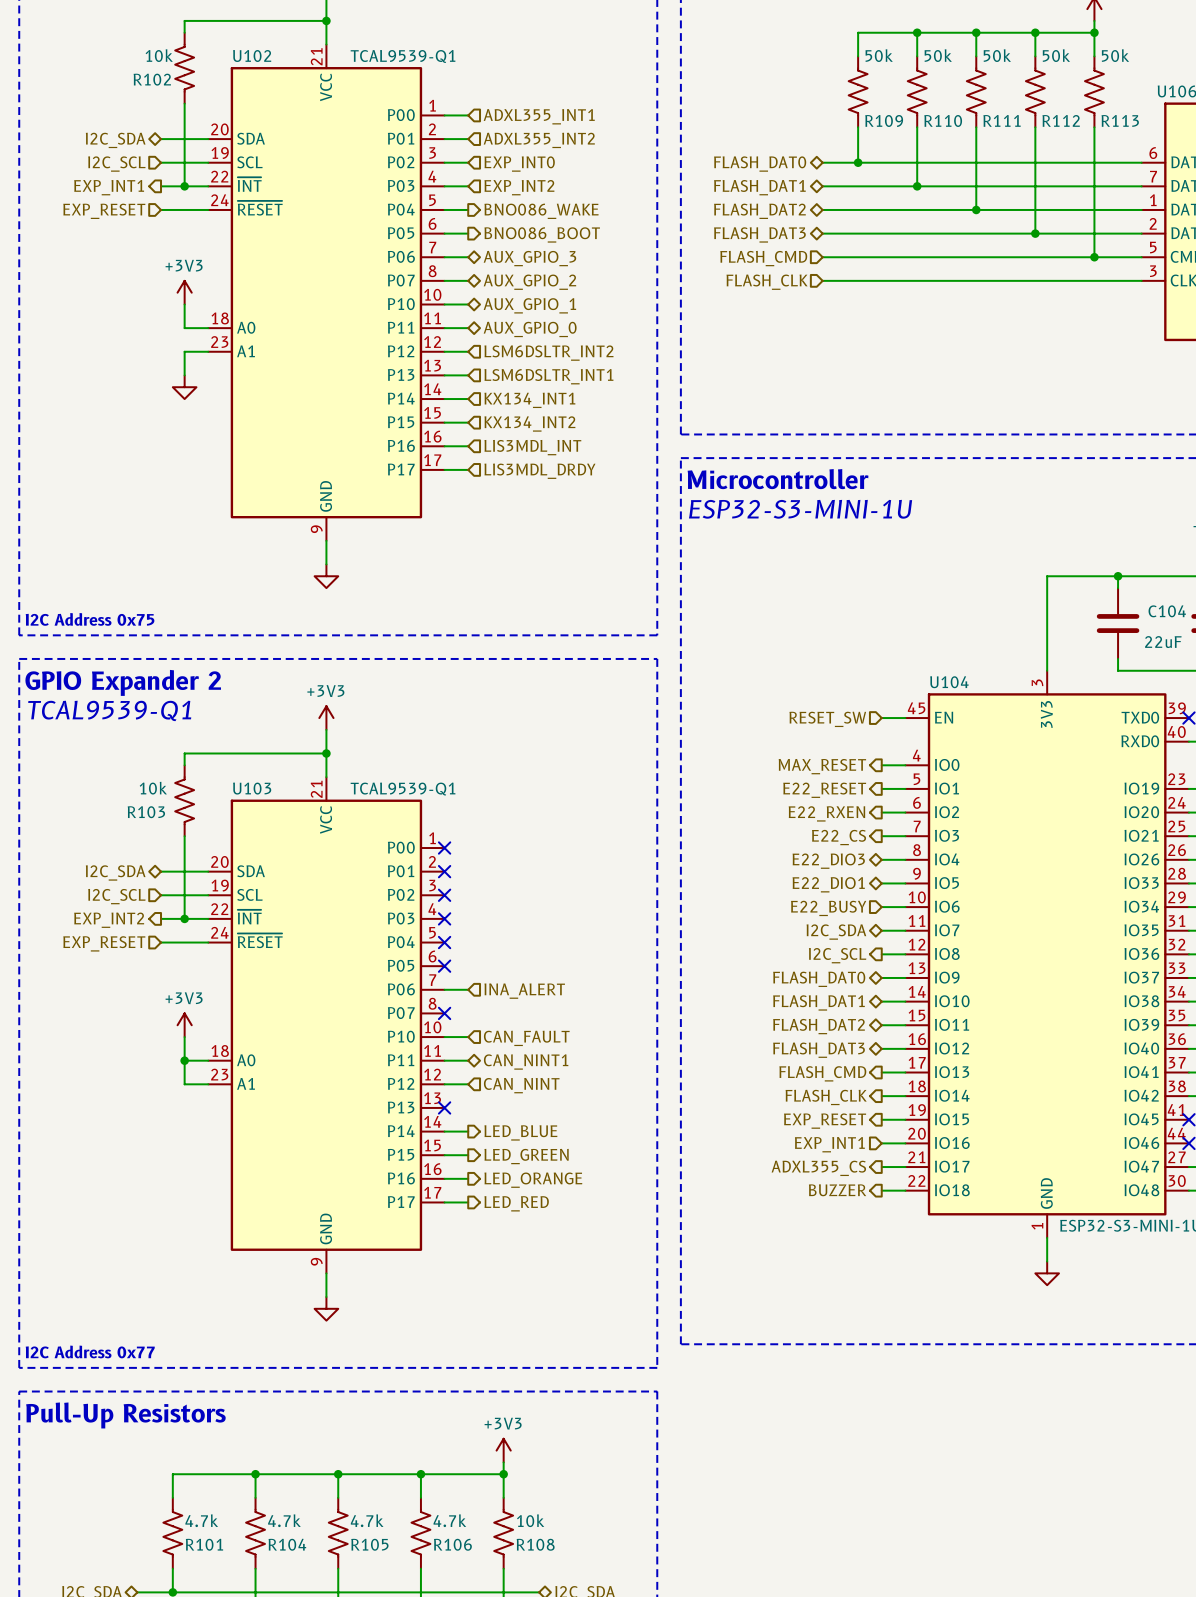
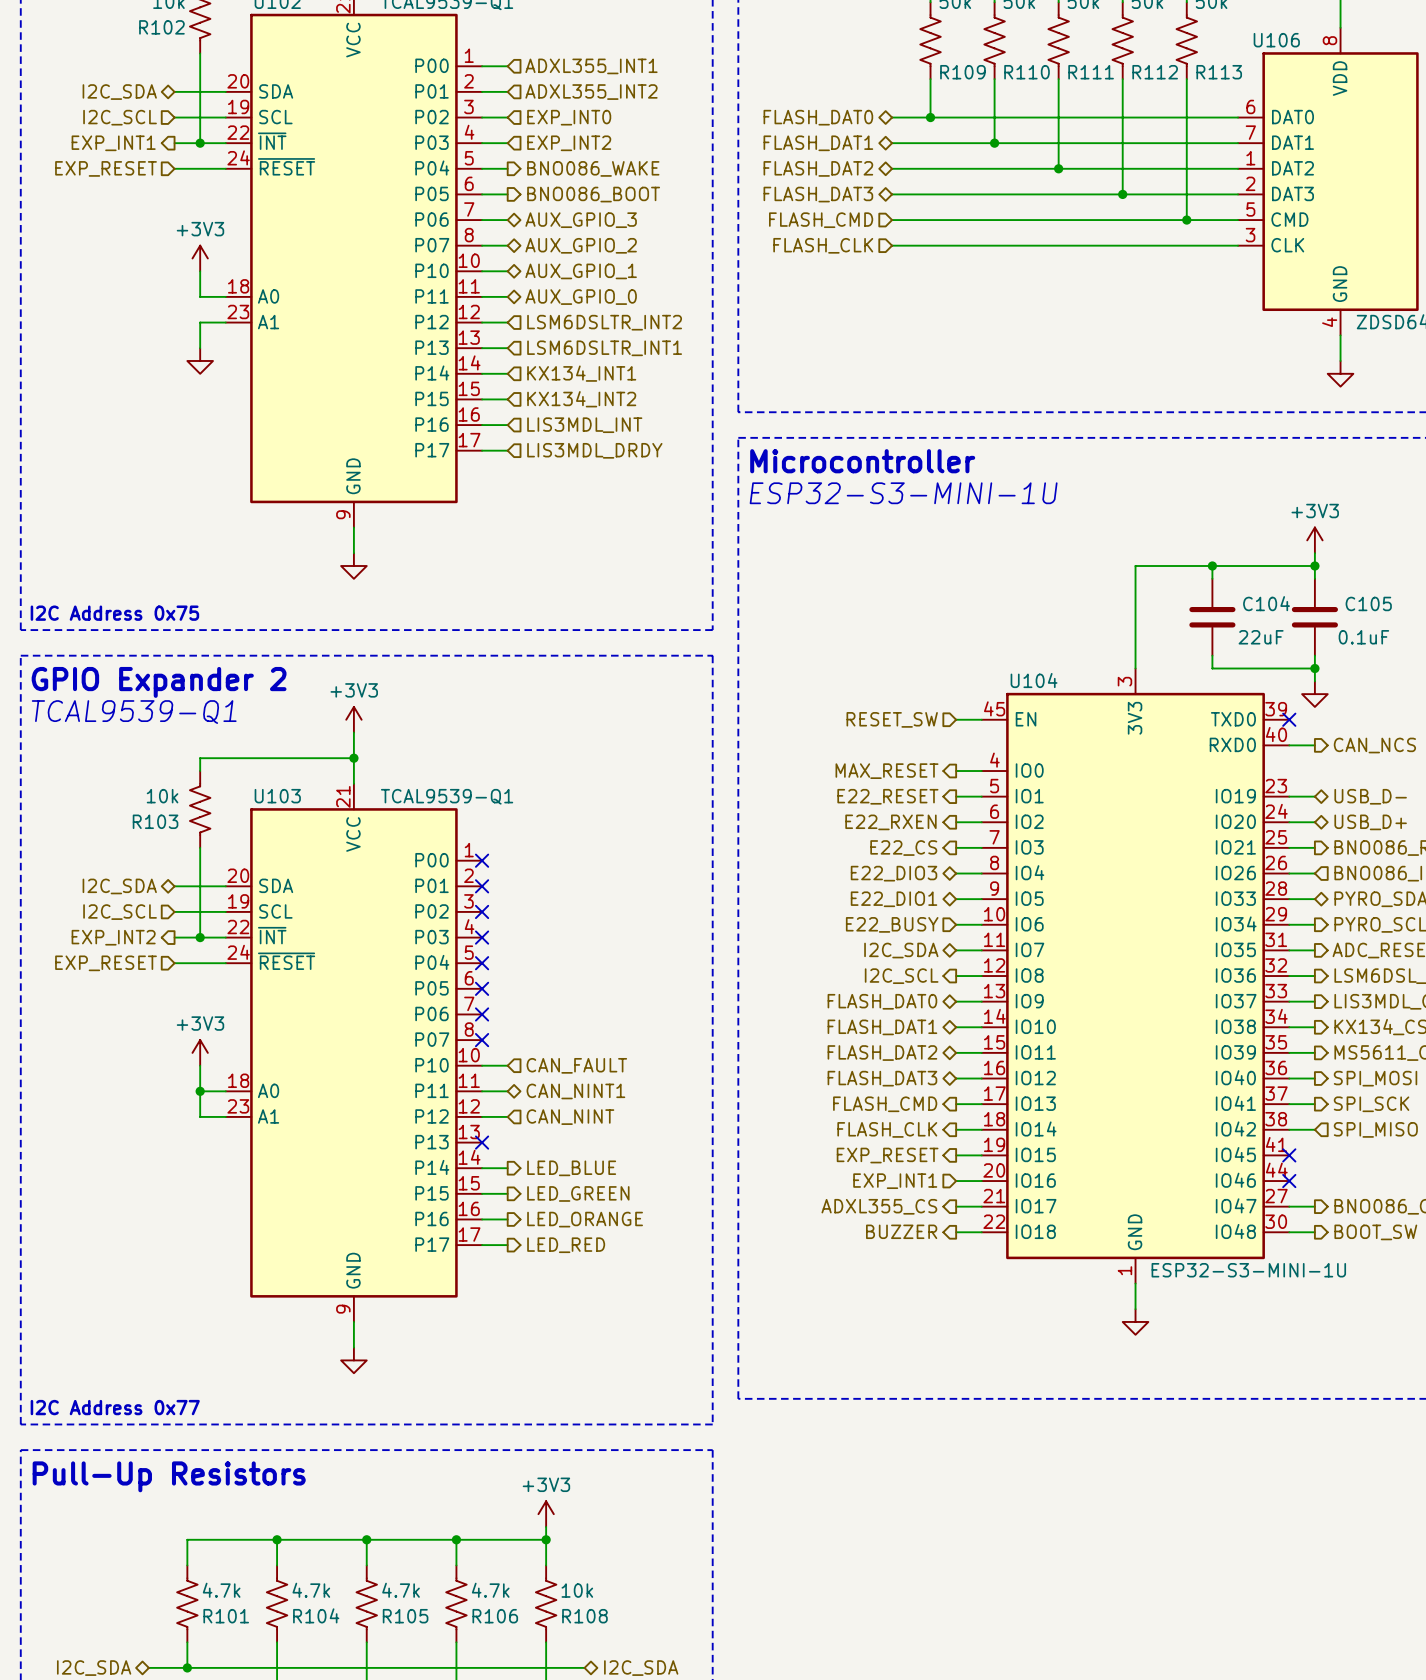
wire: (444, 989) (468, 989) -> none
no-connect mark: none -> (482, 1014)
hierarchical label: INA_ALERT (524, 991) -> none

